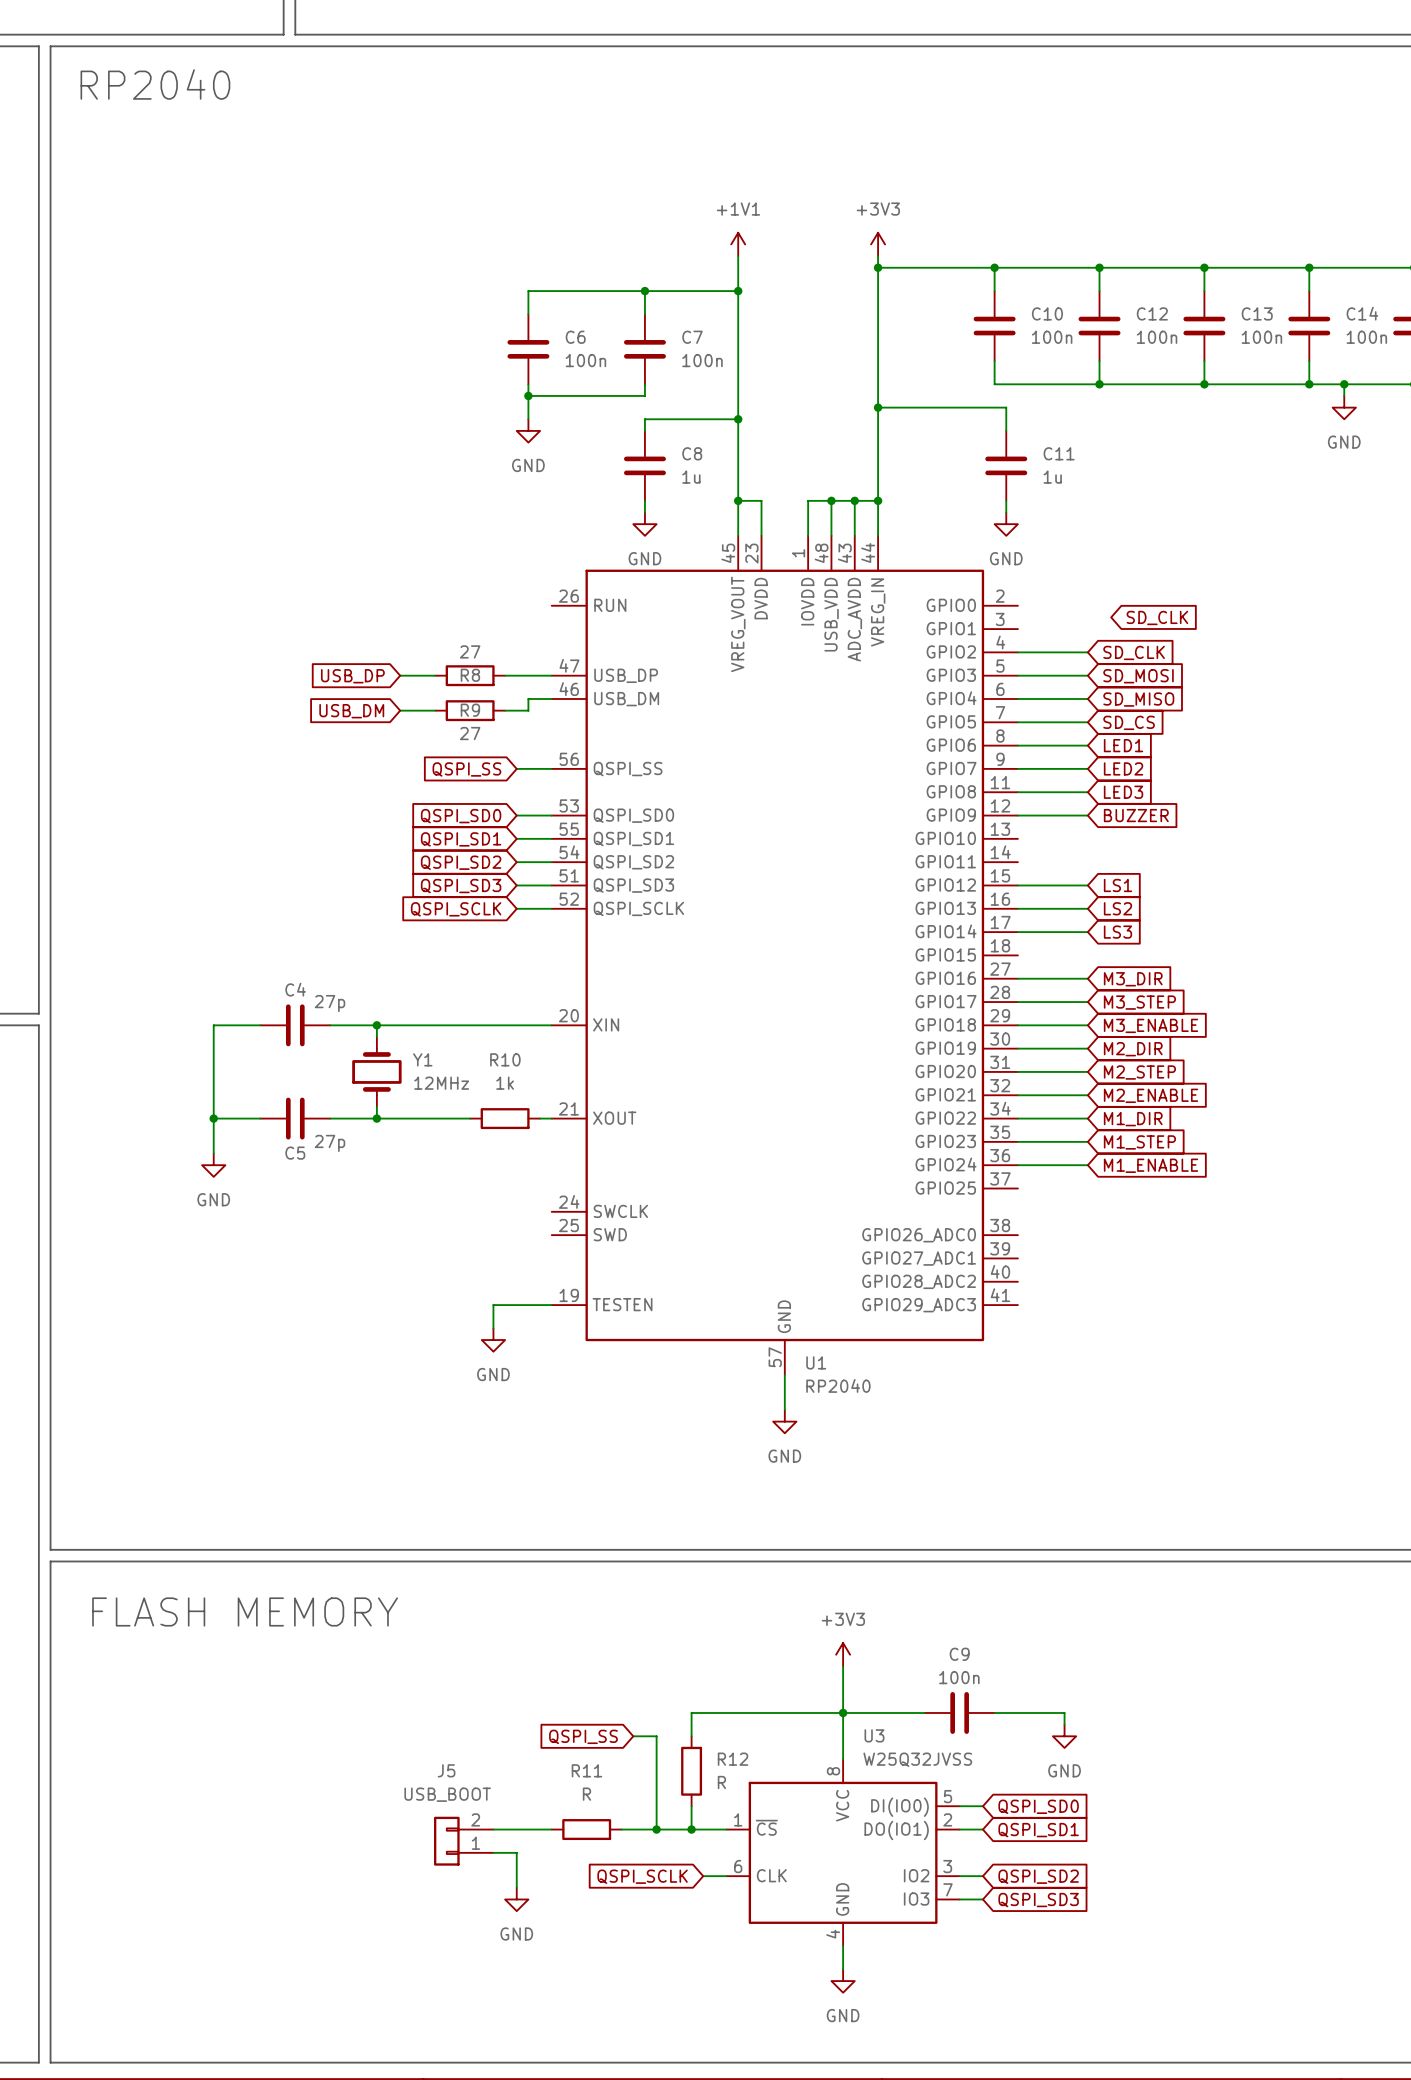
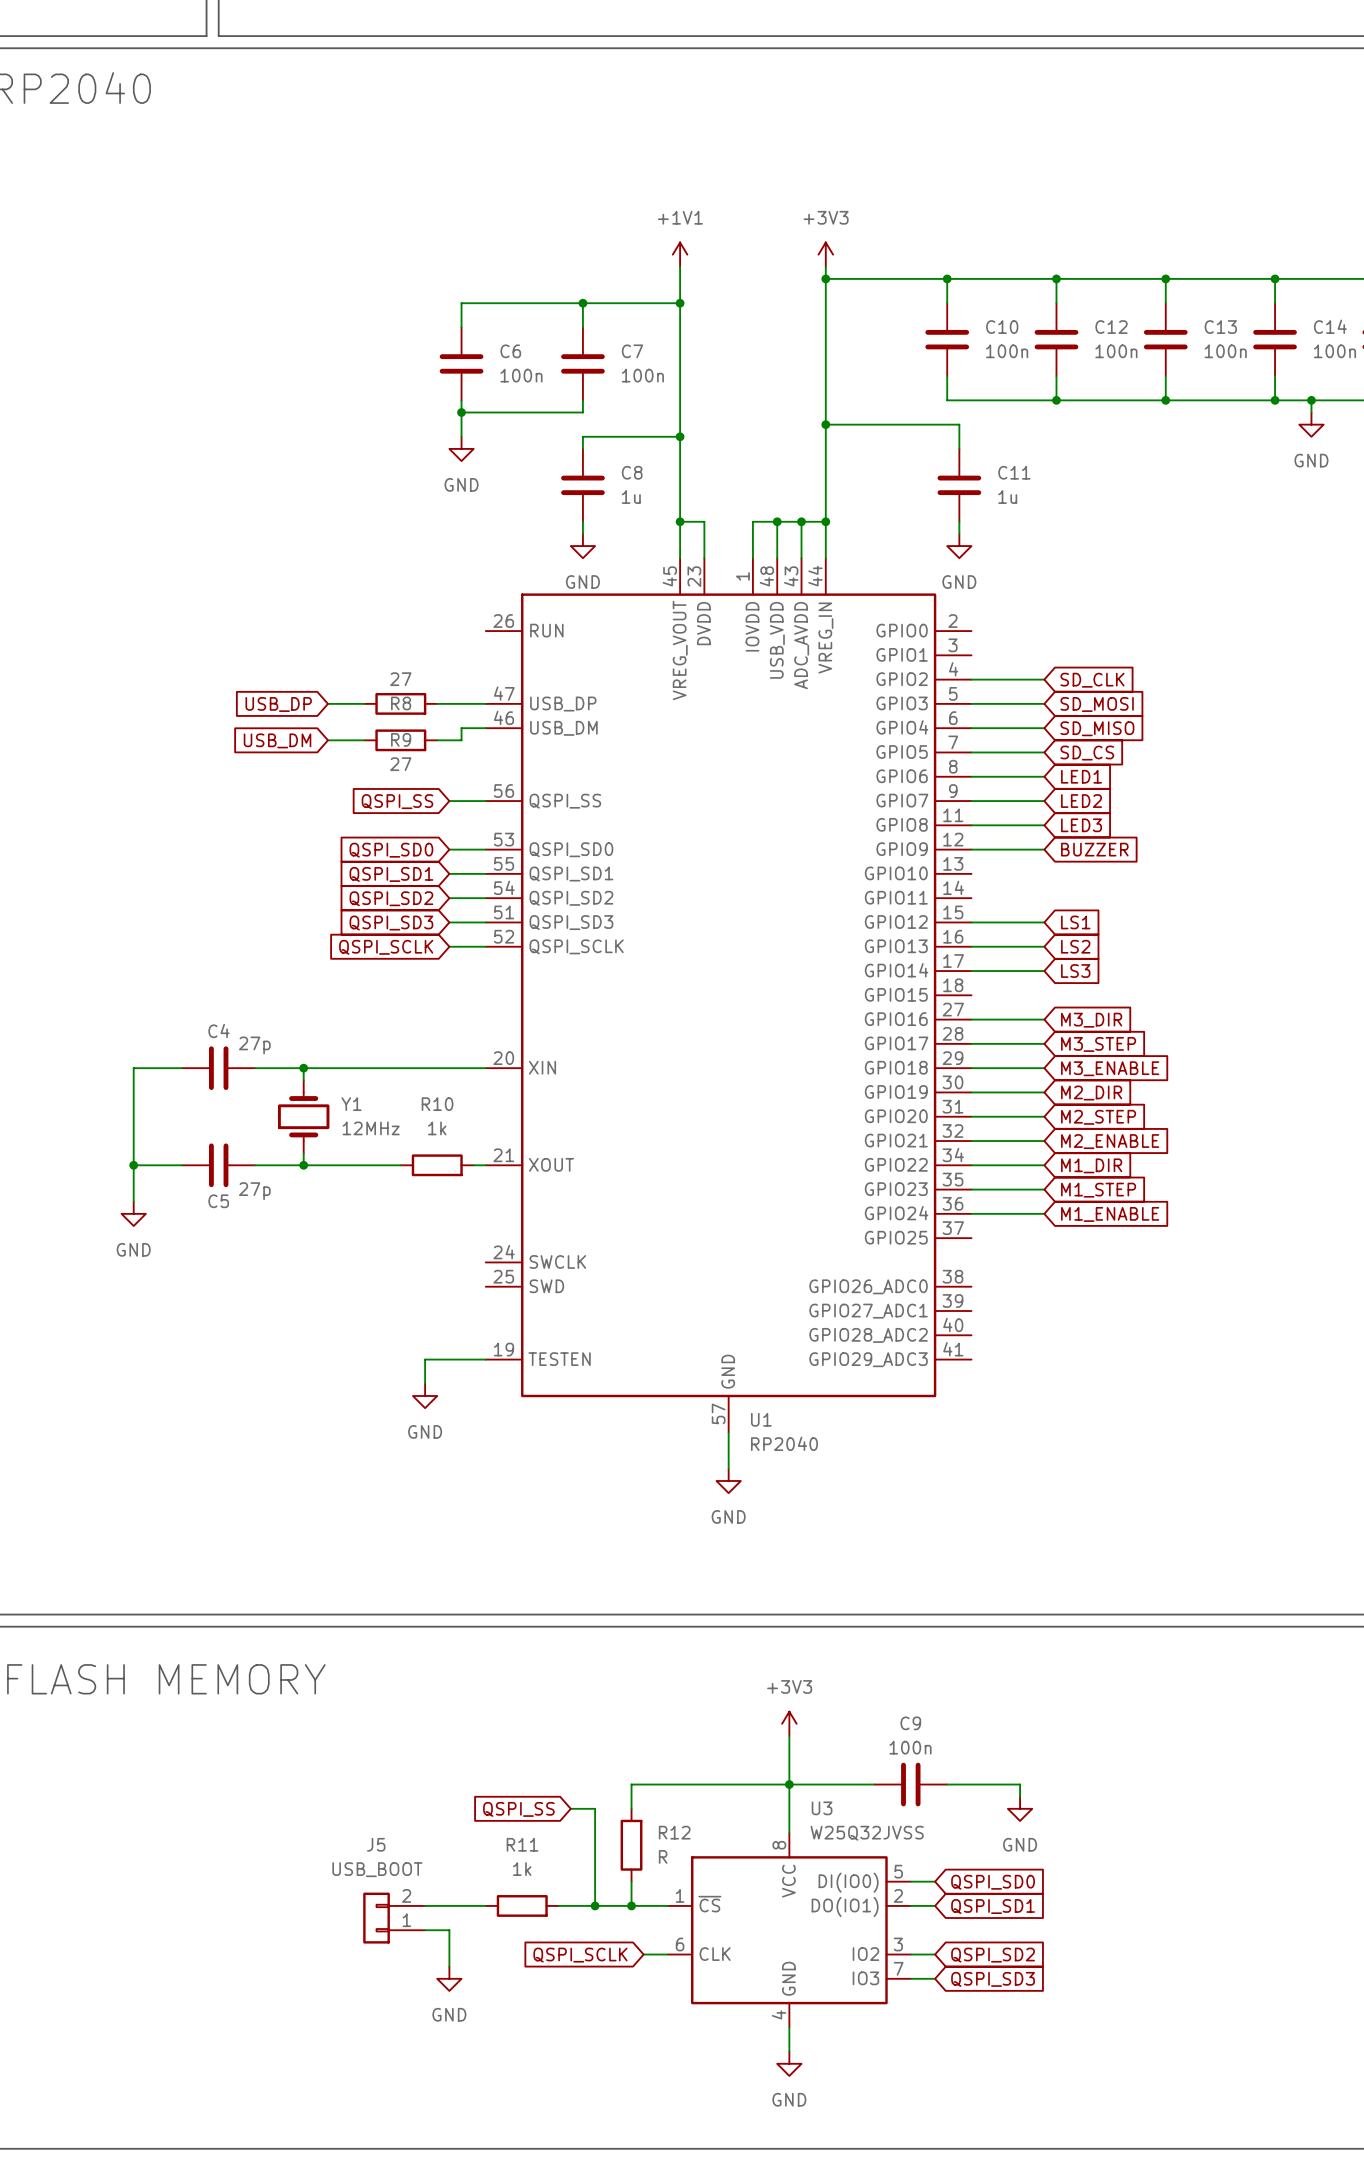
global label: SD_CLK (1157, 617) -> none
R11 value: R (586, 1794) -> 1k (522, 1869)

